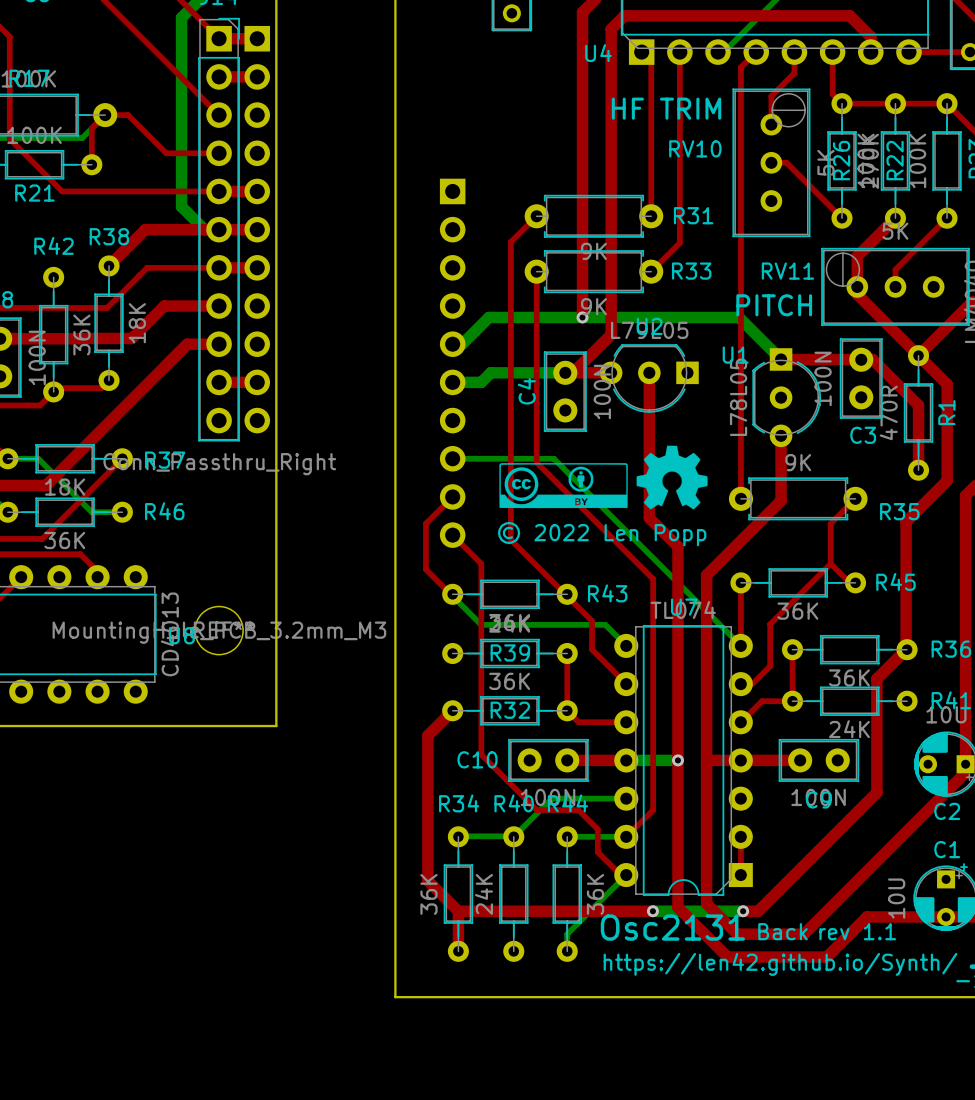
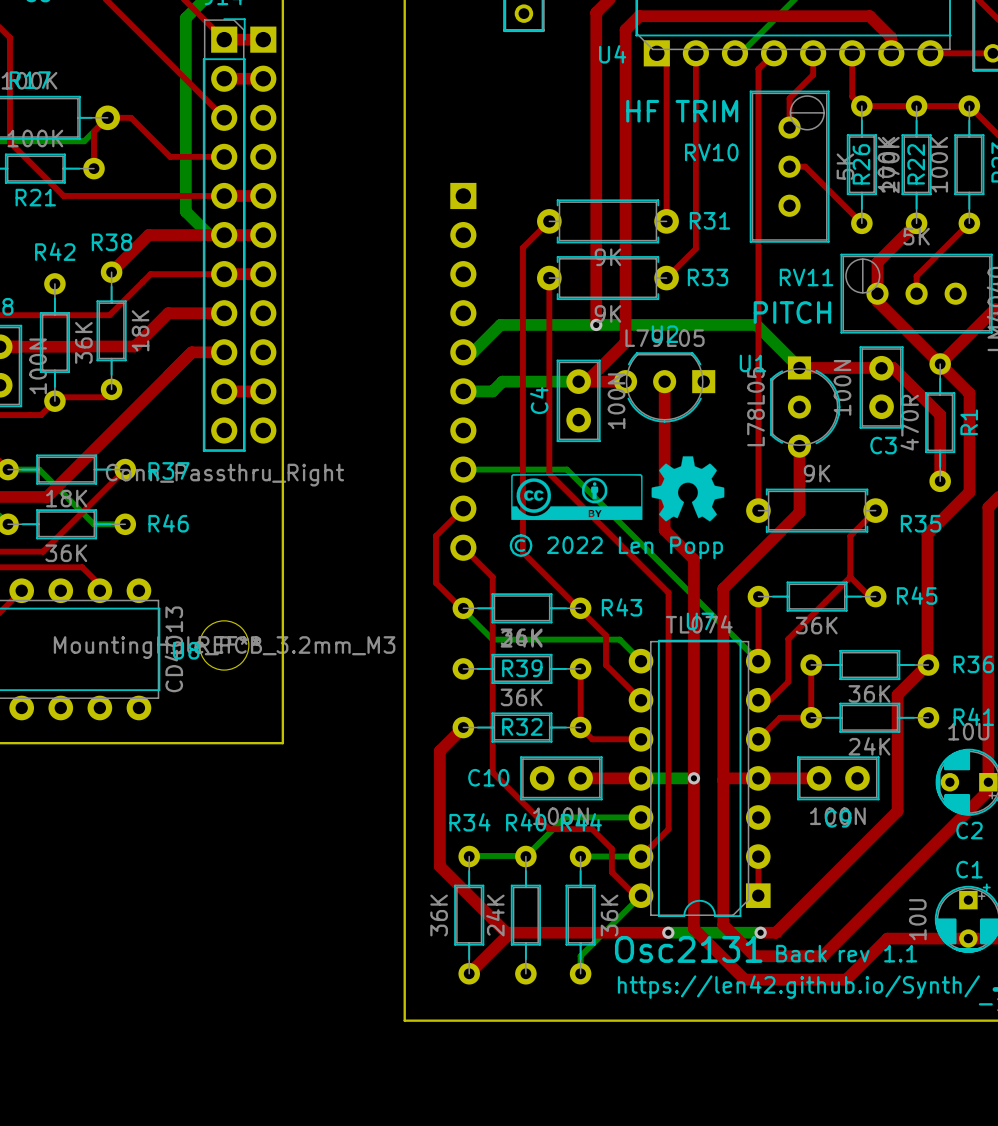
top track: (429, 733) (427, 735) (427, 880) (458, 911) -> (439, 750) (439, 866) (506, 932) (506, 936) (469, 973)
top track: (458, 911) (458, 951) -> none
top track: (458, 911) (494, 911) -> none

